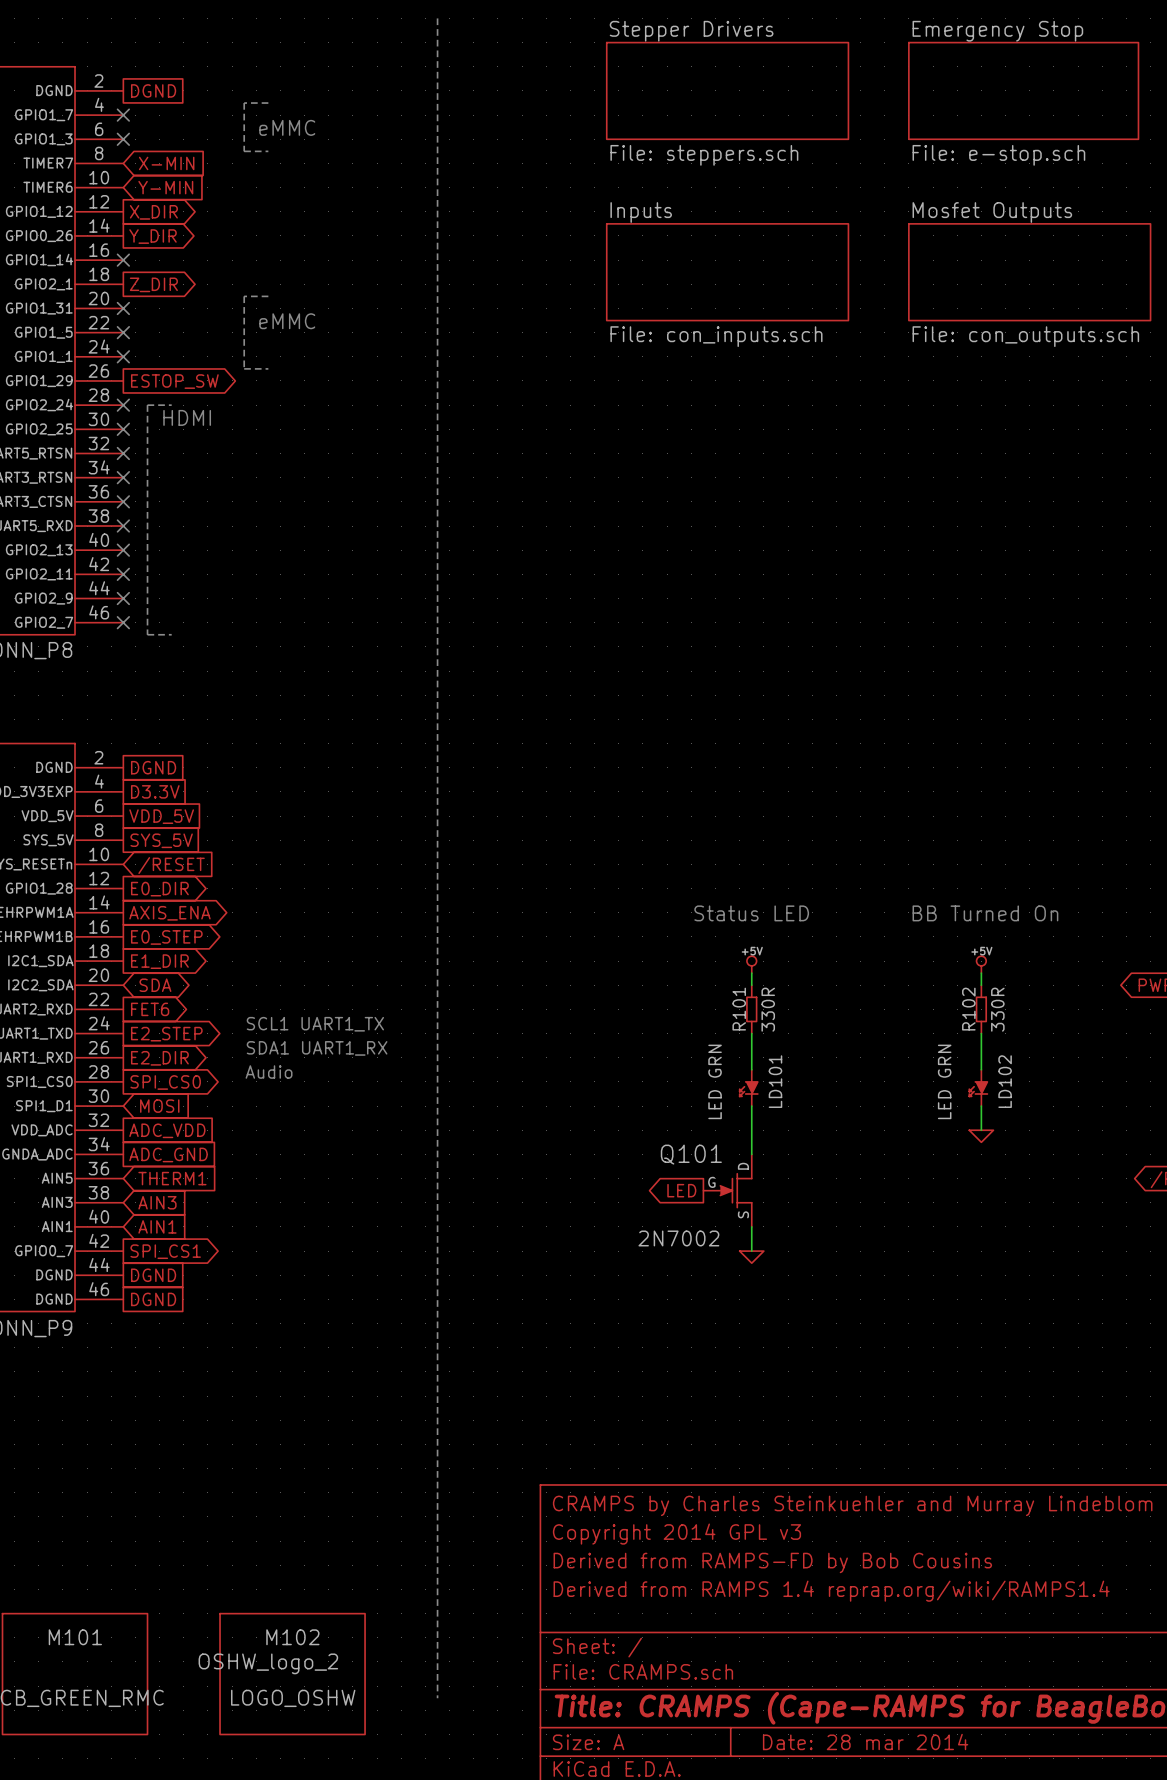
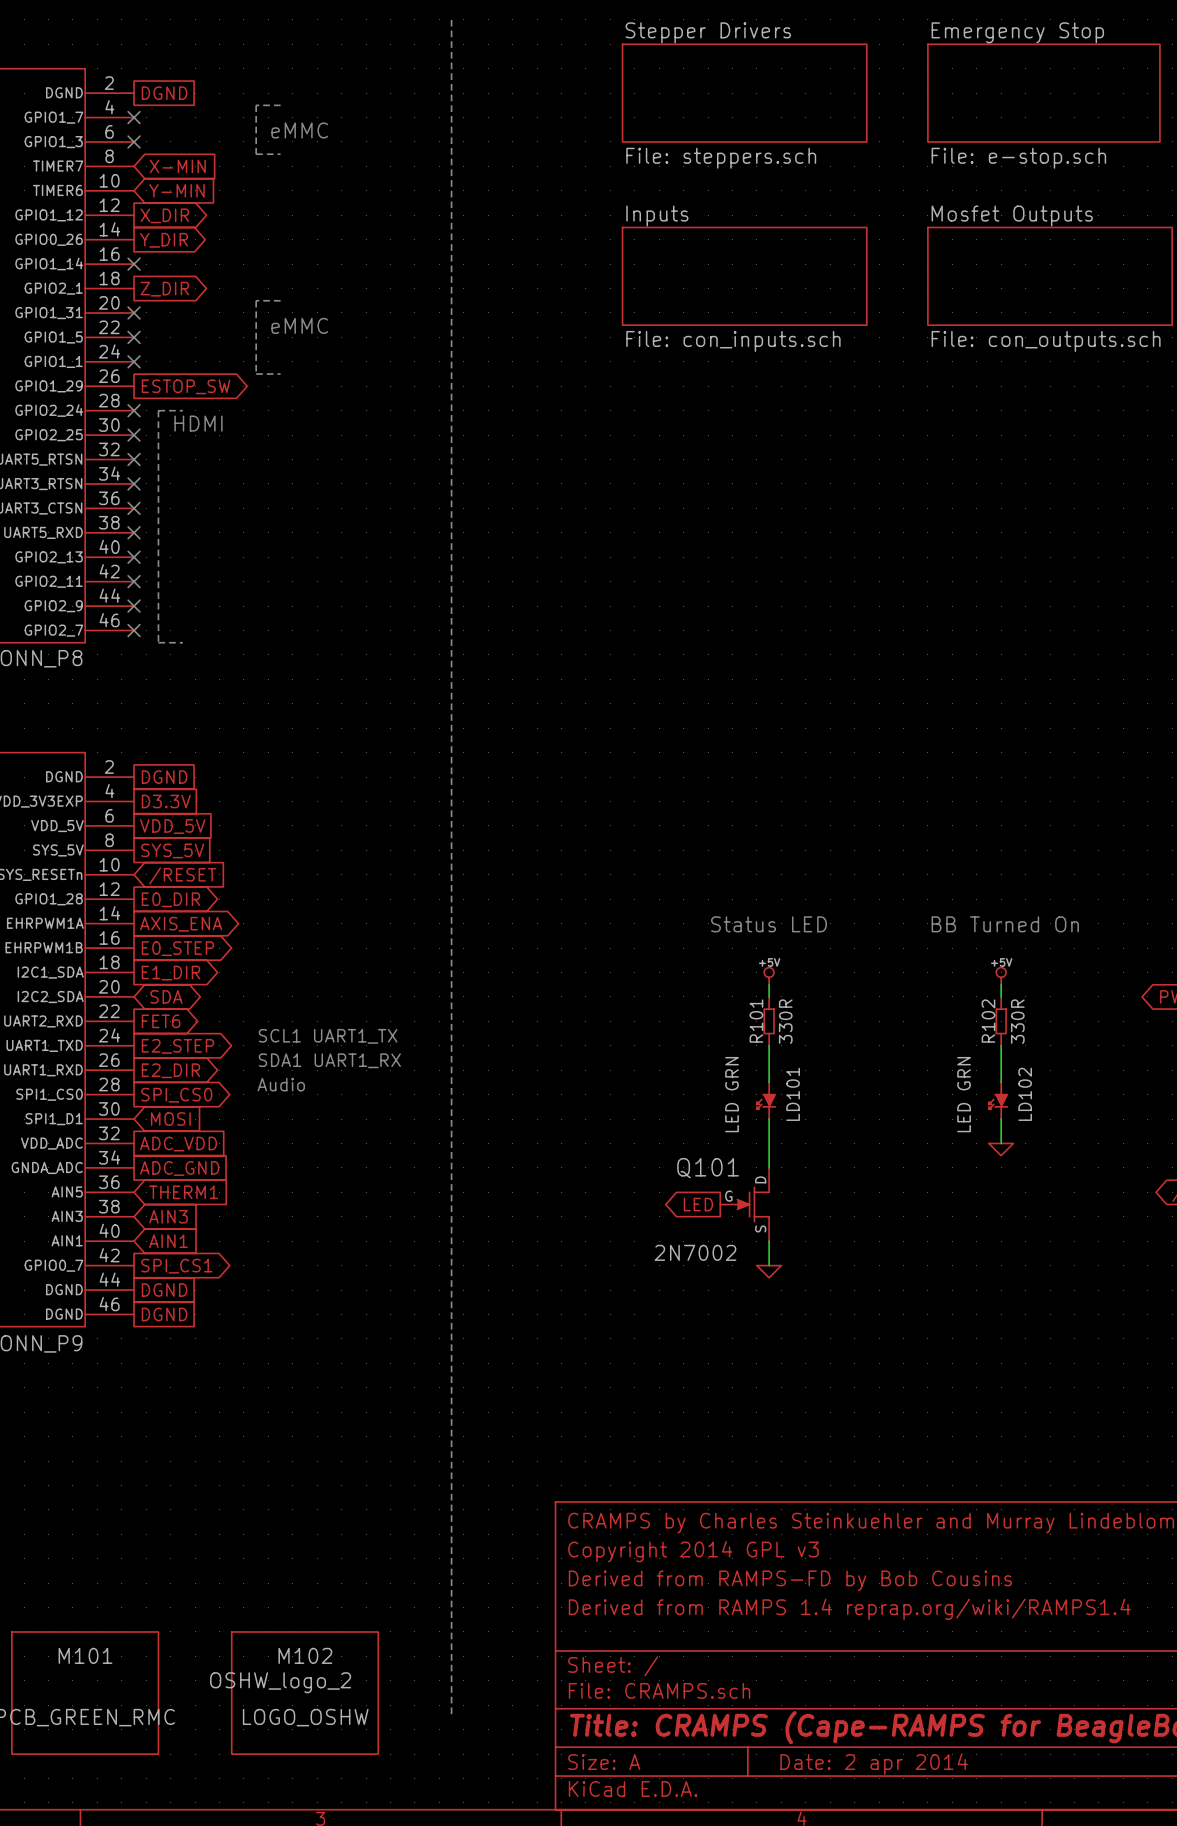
title block: Date: 28 mar 2014 (865, 1741) -> Date: 2 apr 2014 (874, 1764)

